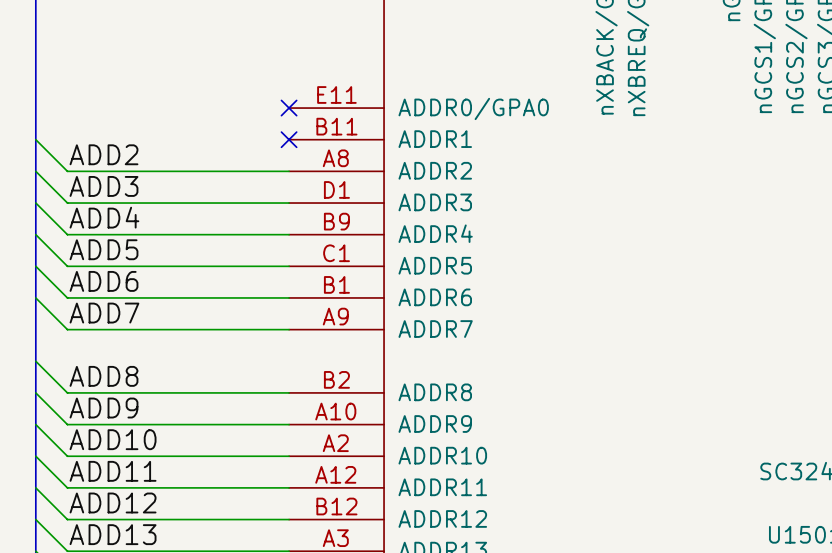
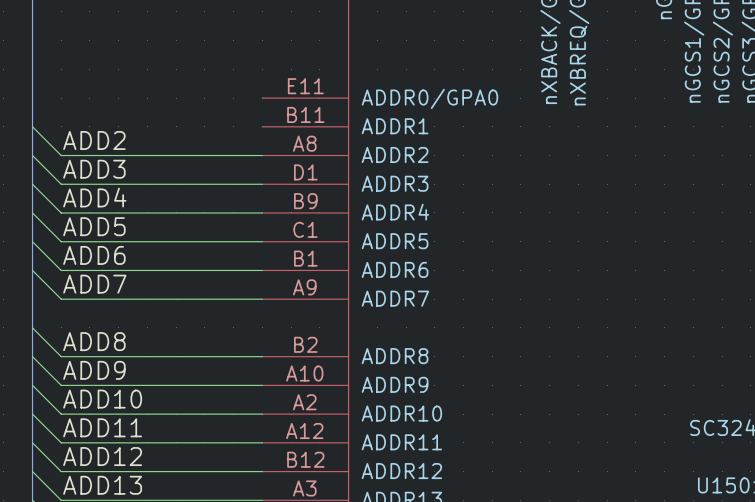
no-connect mark: (289, 108) -> none
no-connect mark: (289, 139) -> none

